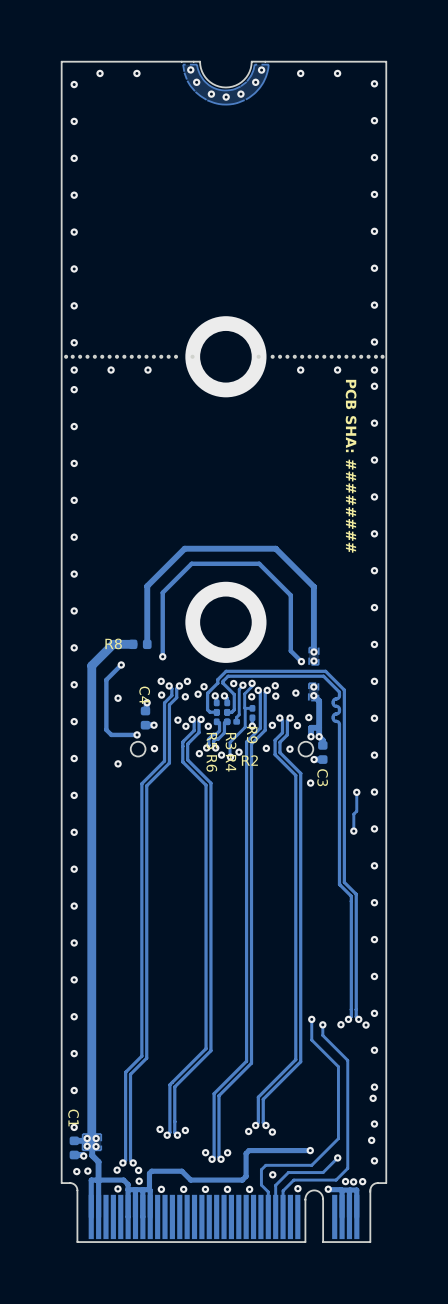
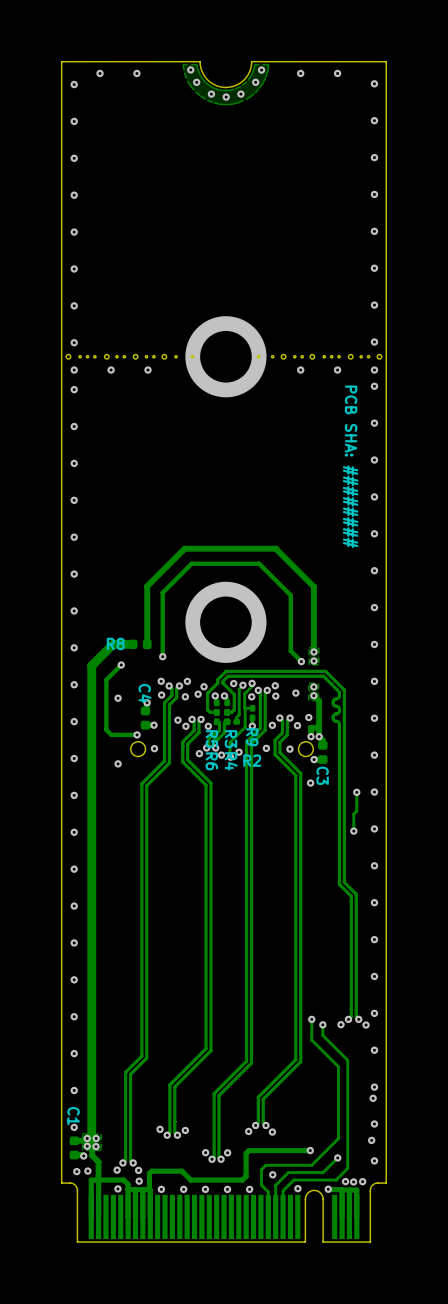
round board edge: none -> [65, 353, 72, 360]
round board edge: none -> [103, 353, 110, 360]
round board edge: none -> [132, 353, 139, 360]
round board edge: none -> [161, 353, 168, 360]
round board edge: none -> [280, 353, 287, 360]
round board edge: none -> [309, 353, 316, 360]
round board edge: none -> [347, 353, 354, 360]
round board edge: none -> [376, 353, 383, 360]
round board edge: [64, 354, 68, 359] -> none
round board edge: [70, 354, 75, 359] -> none
round board edge: [100, 354, 105, 359] -> none
round board edge: [107, 354, 112, 359] -> none
round board edge: [129, 354, 134, 359] -> none
round board edge: [137, 354, 141, 359] -> none
round board edge: [159, 354, 164, 359] -> none
round board edge: [166, 354, 171, 359] -> none
round board edge: [278, 354, 282, 359] -> none
round board edge: [285, 354, 290, 359] -> none
round board edge: [307, 354, 312, 359] -> none
round board edge: [315, 354, 319, 359] -> none
round board edge: [344, 354, 349, 359] -> none
round board edge: [351, 354, 356, 359] -> none
round board edge: [374, 354, 378, 359] -> none
round board edge: [380, 354, 385, 359] -> none

